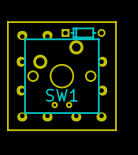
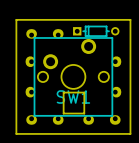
SW1 footprint: [24, 38, 100, 114] -> [34, 37, 113, 117]
board edge: none -> (63, 92) (63, 113) (84, 113) (84, 92) (63, 92)

